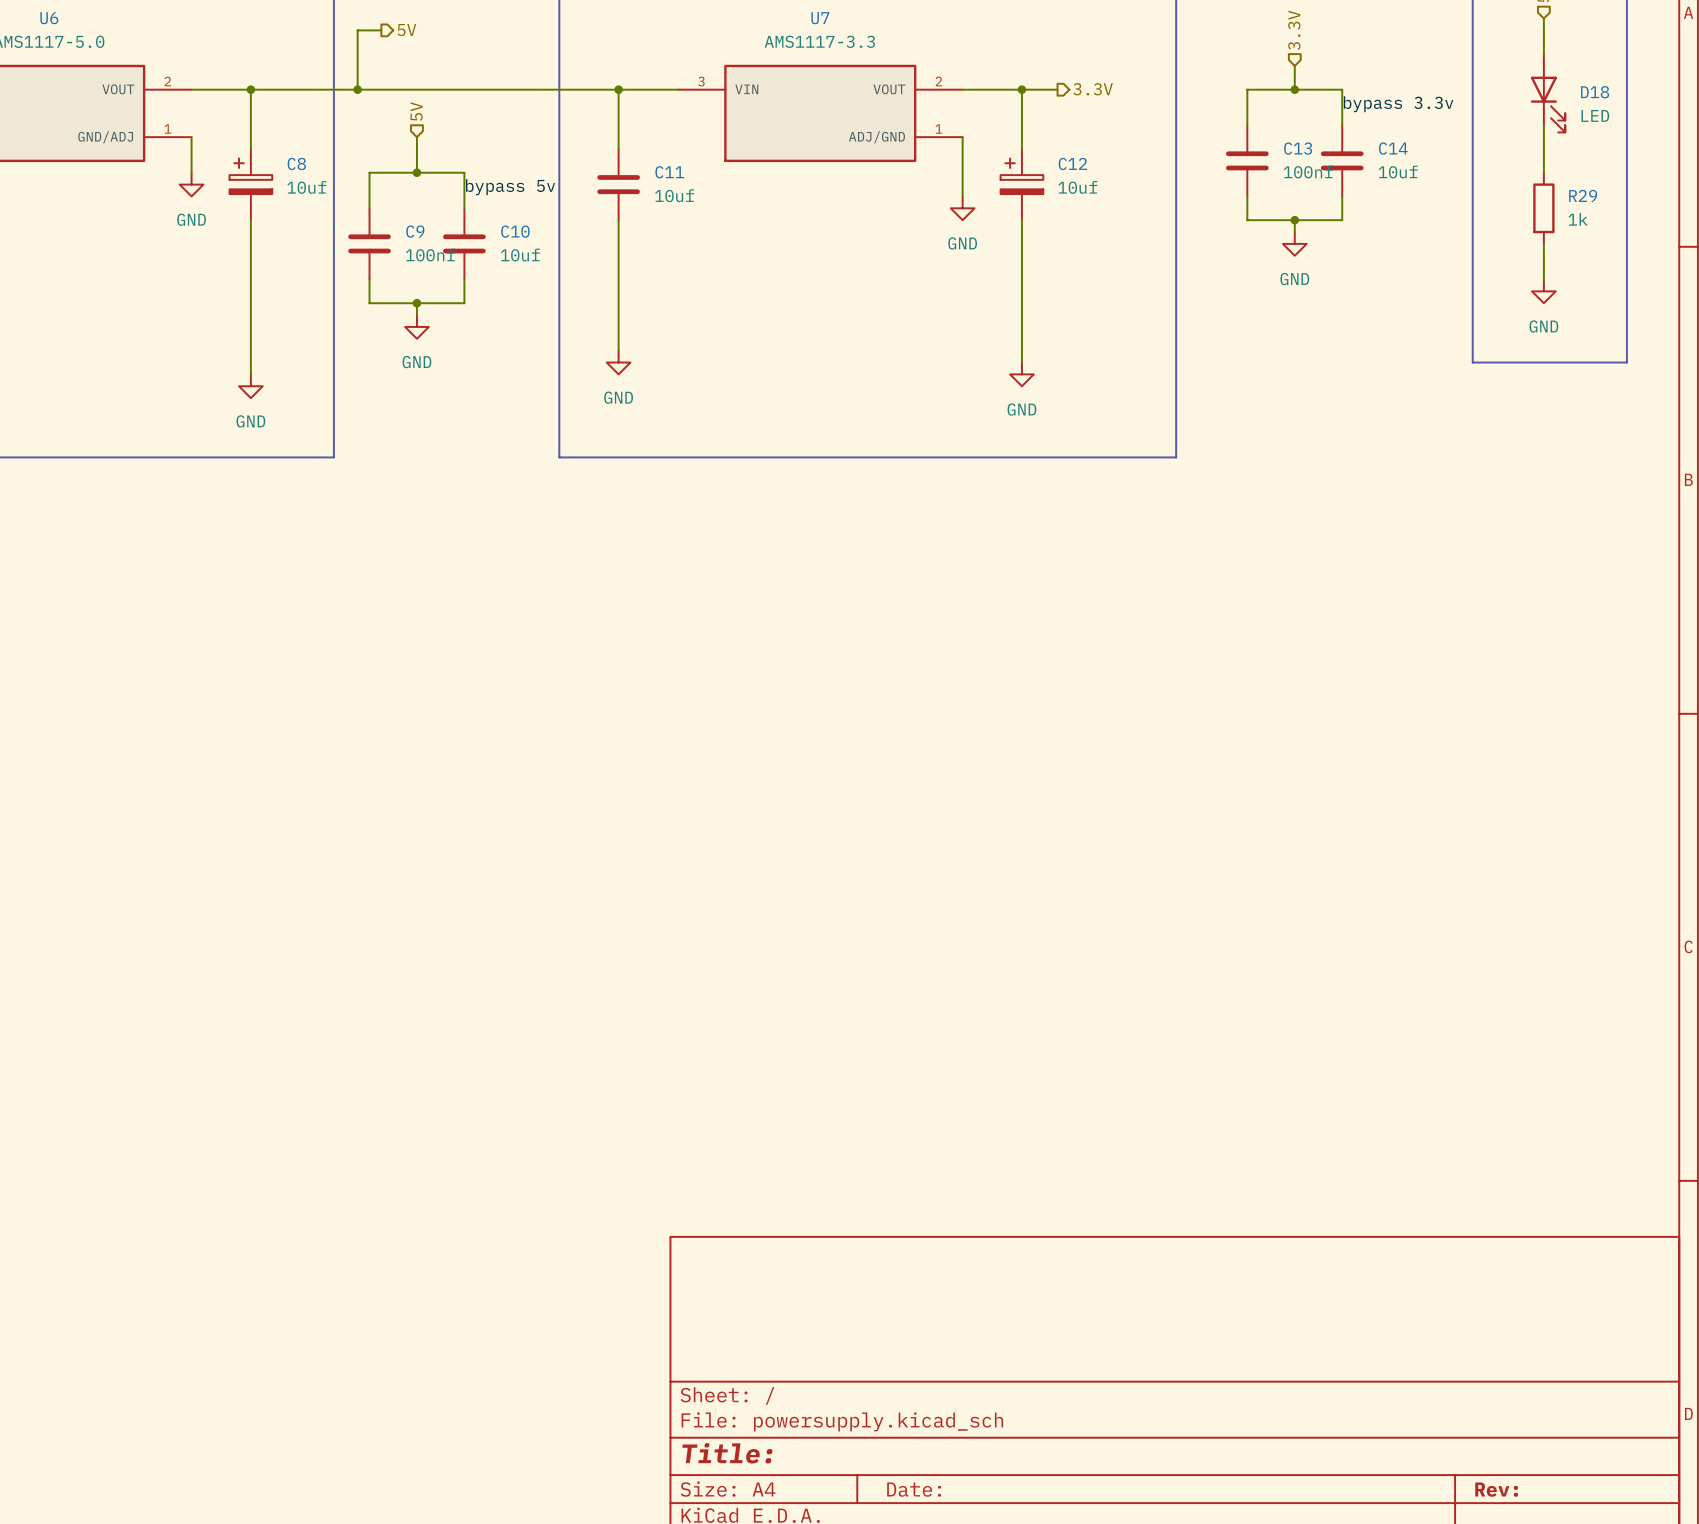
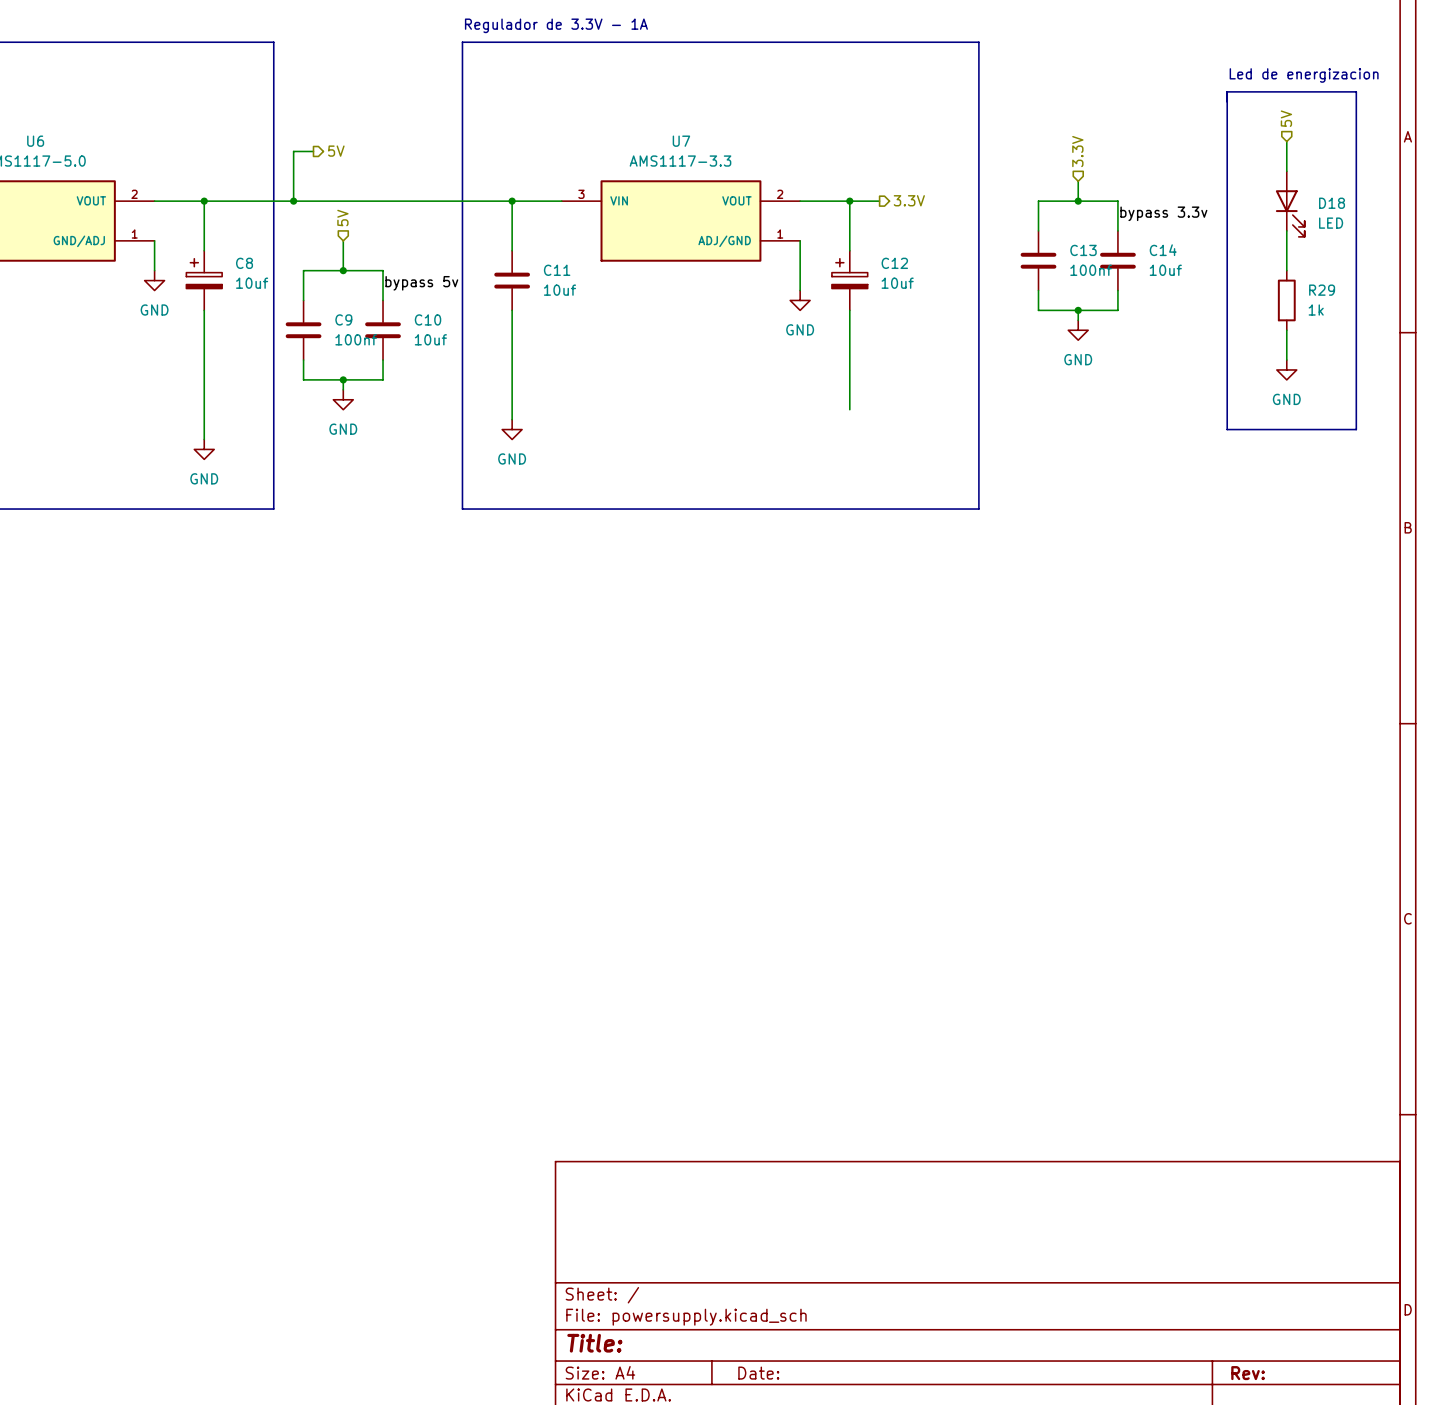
wire: (1021, 338) (1021, 362) -> none
power symbol: GND (1021, 374) -> none

